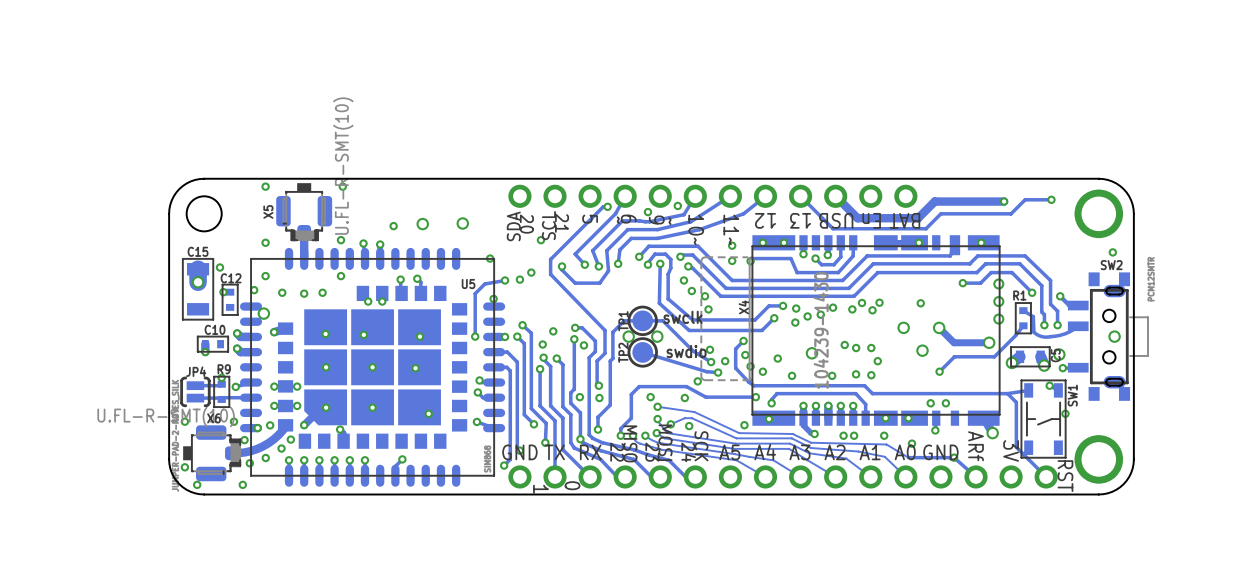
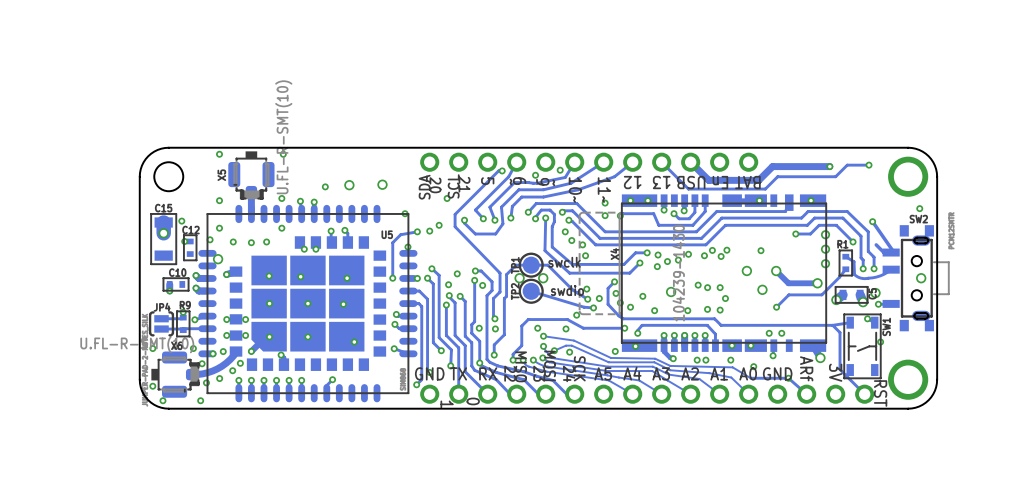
track: none -> (872, 221) (894, 252)
via position: (1060, 296) -> (872, 221)

